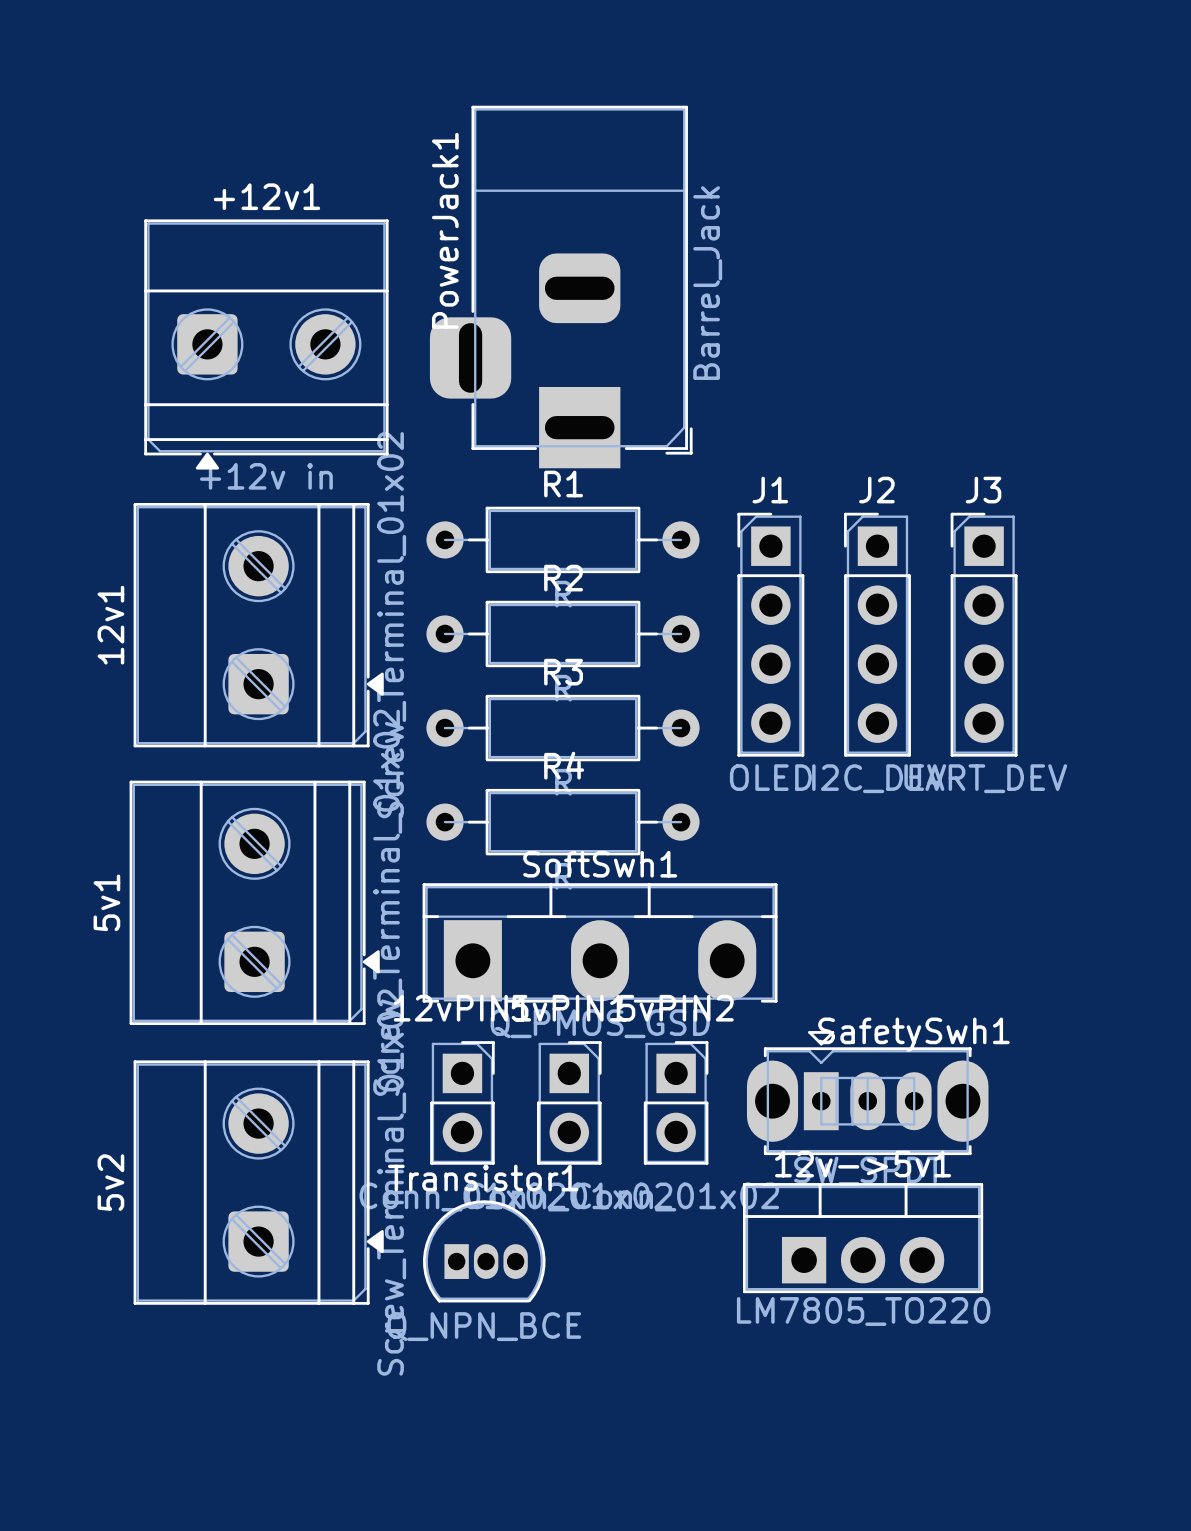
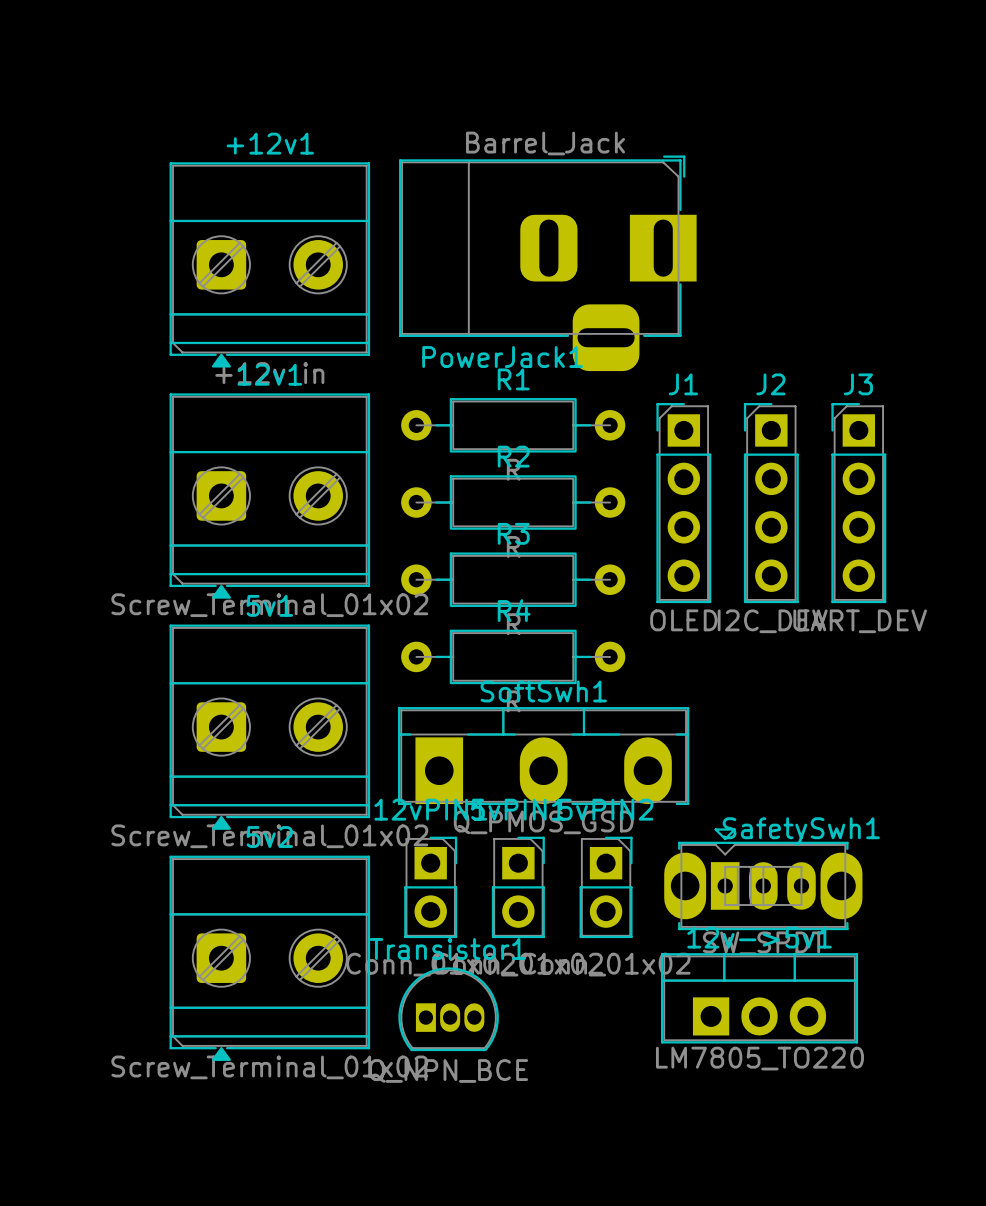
PowerJack1 rotation: 0° (561, 287) -> 90° counterclockwise (547, 263)
12v1 rotation: 0° (258, 625) -> 90° clockwise (269, 496)
5v1 rotation: 0° (254, 902) -> 90° clockwise (269, 727)
5v2 rotation: 0° (258, 1182) -> 90° clockwise (269, 958)

